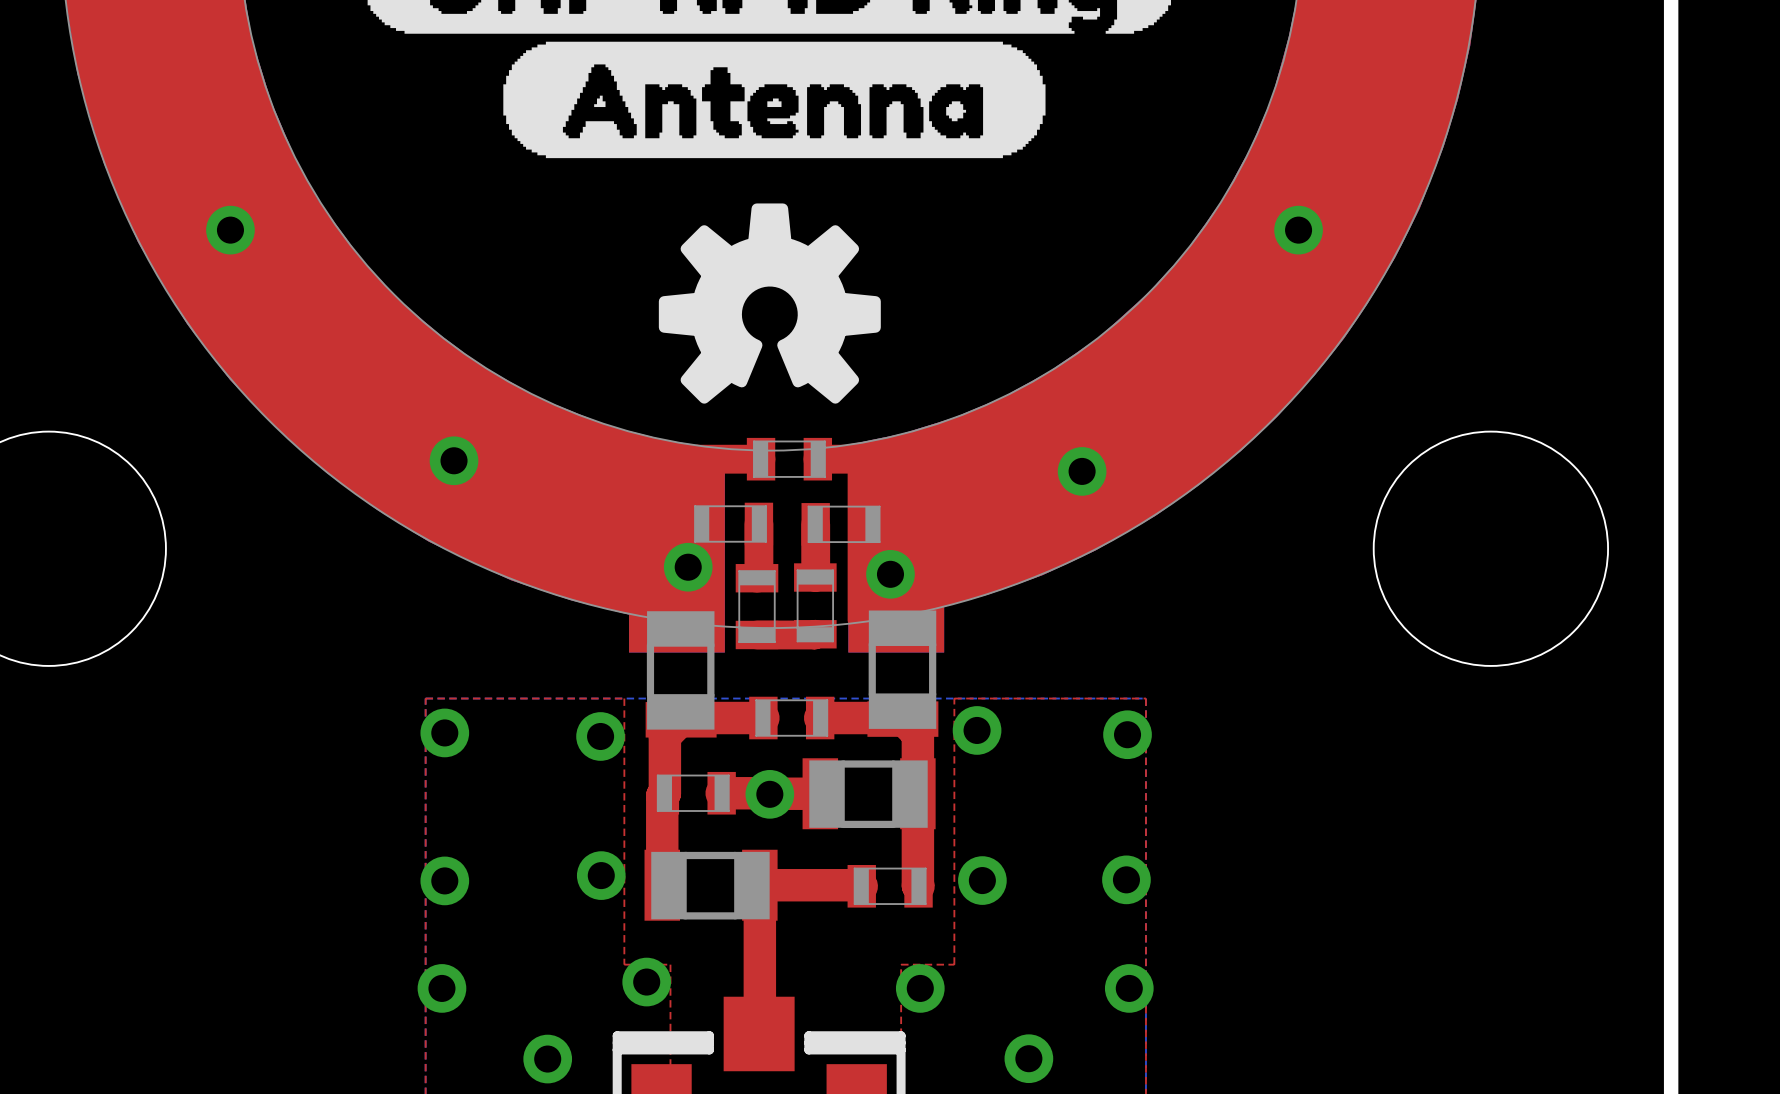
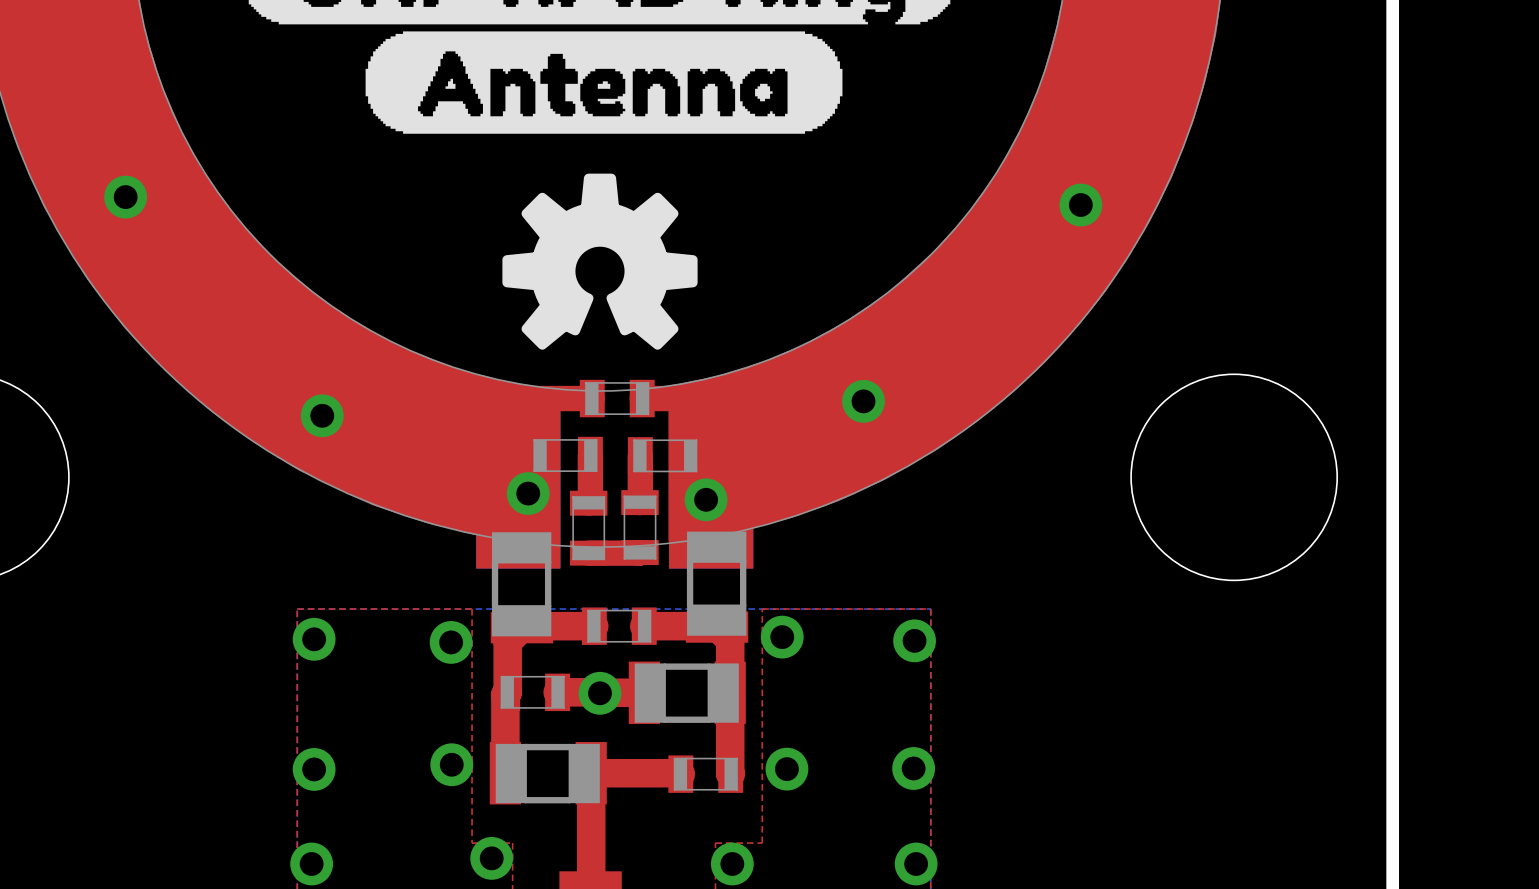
via position: (1298, 230) -> (1080, 205)
via position: (454, 460) -> (322, 415)
via position: (1082, 471) -> (863, 401)

